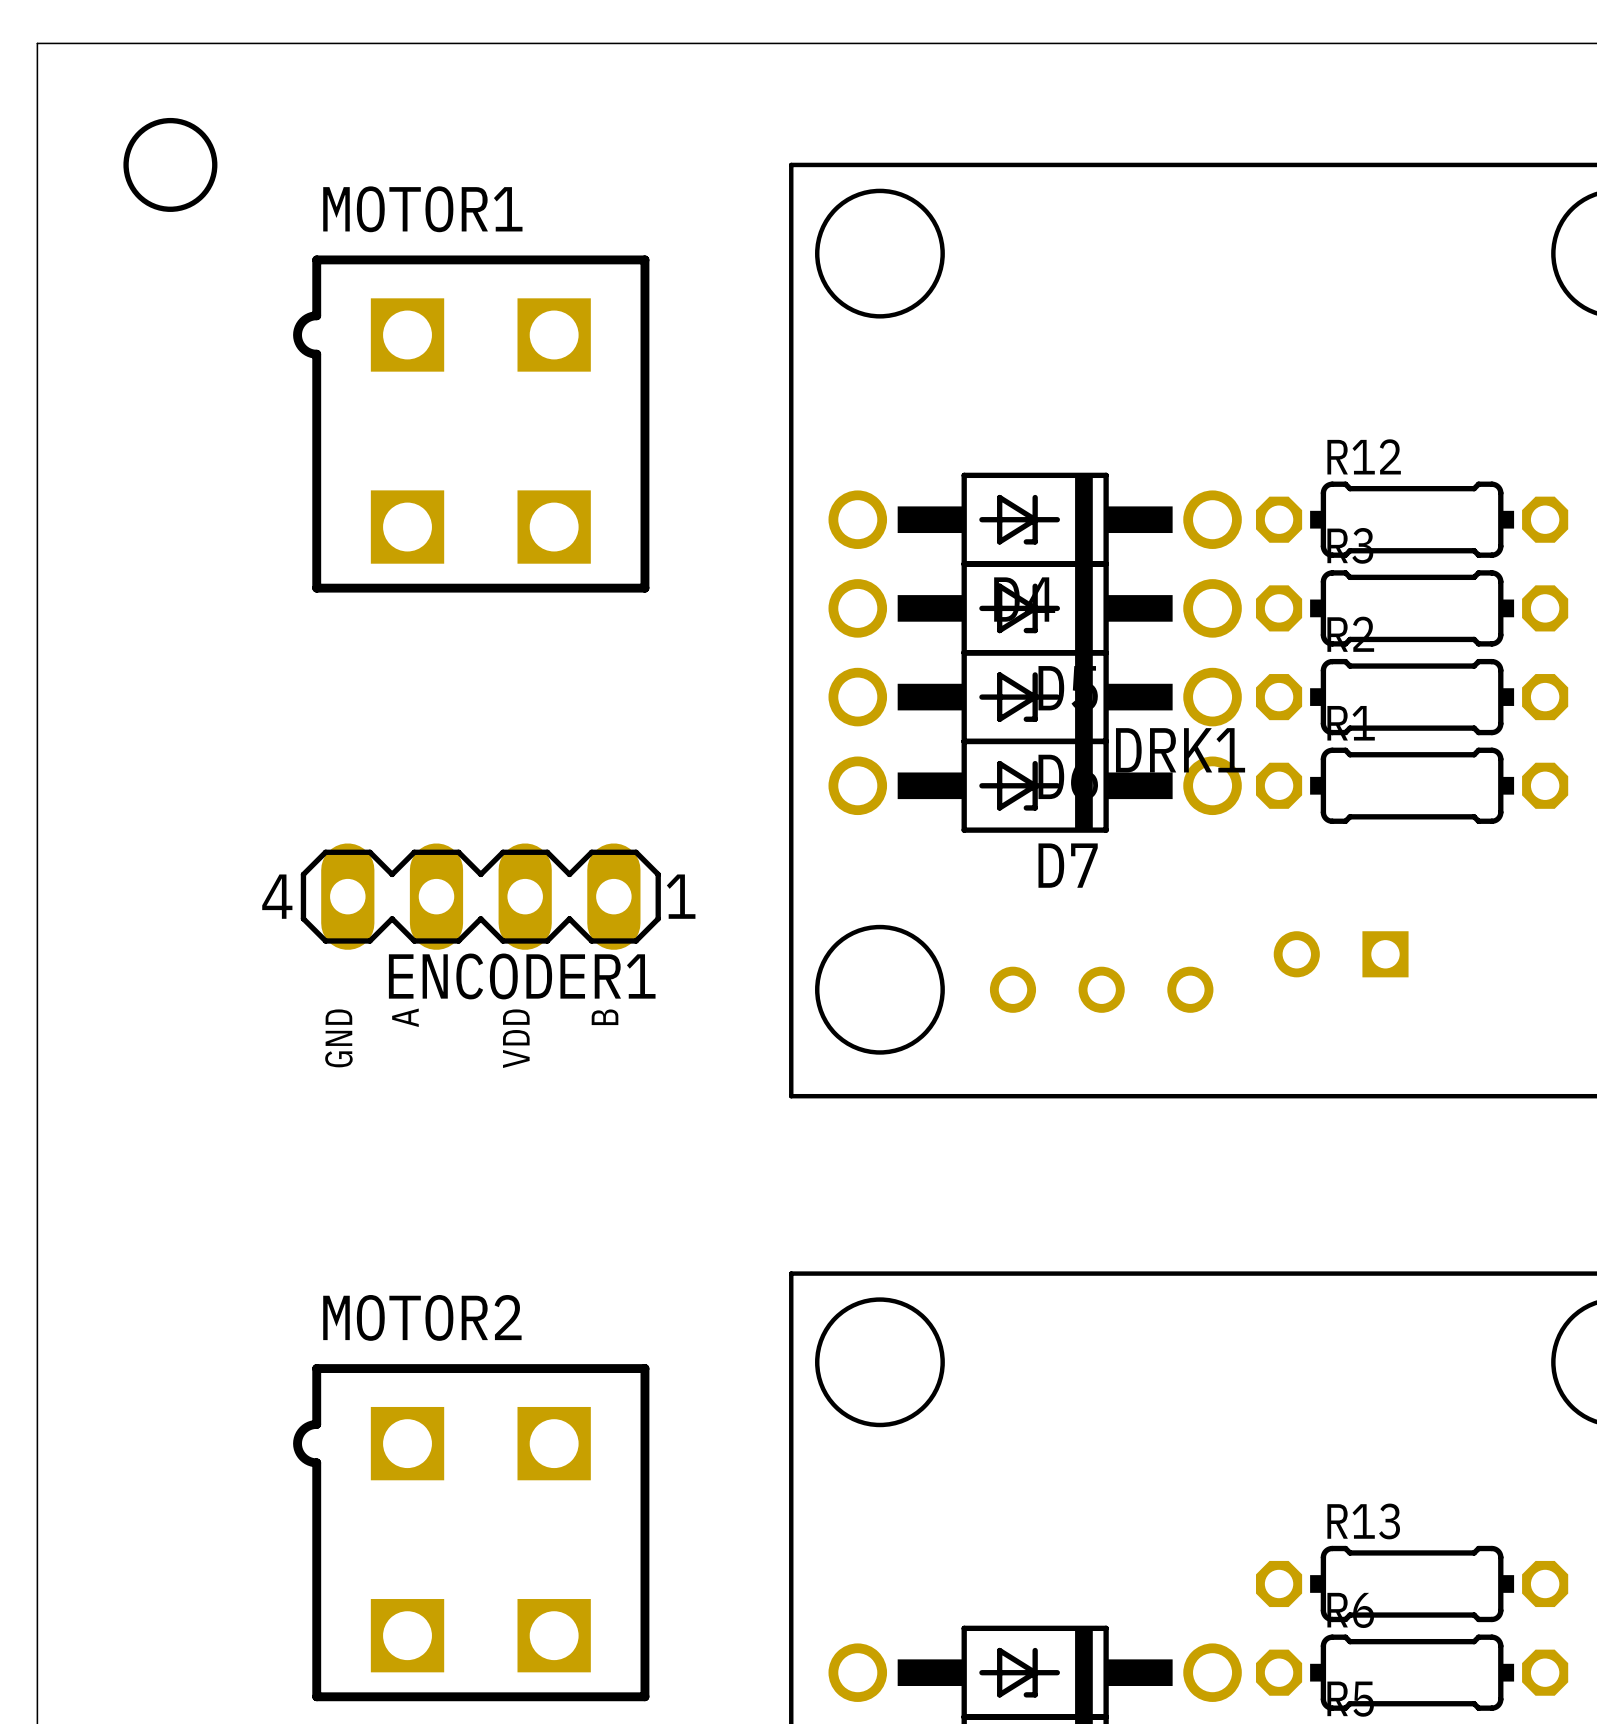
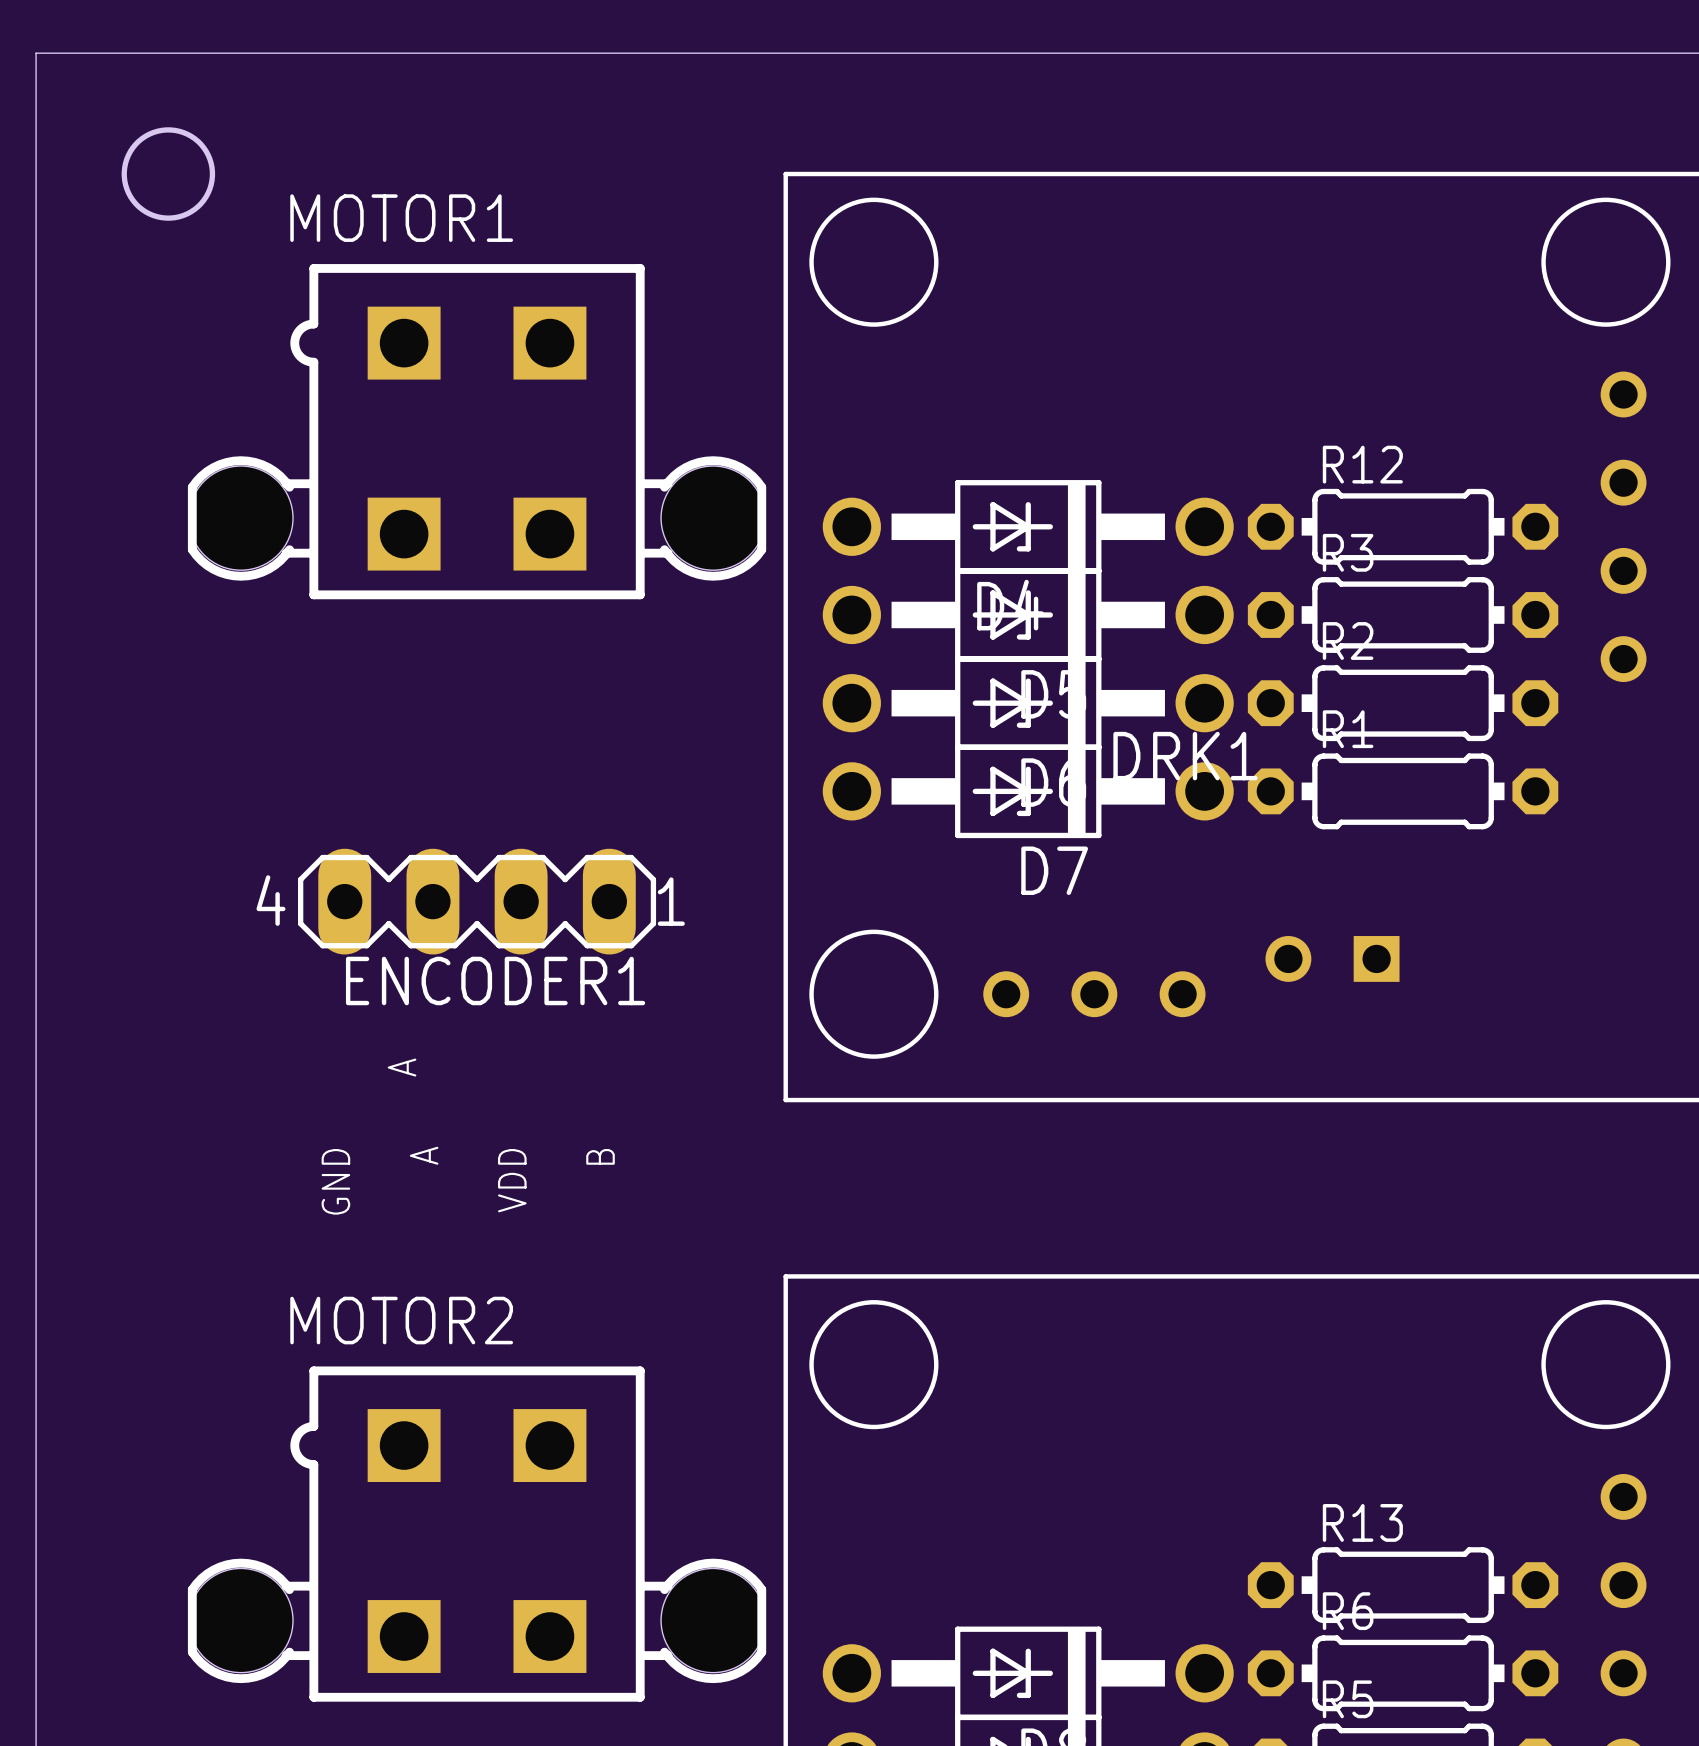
MOTOR1 footprint: [293, 255, 650, 593] -> [187, 264, 767, 600]
text position: A (405, 1017) -> A (402, 1067)
text position: B (605, 1017) -> B (600, 1156)
text position: GND (338, 1038) -> GND (335, 1181)
text position: VDD (516, 1038) -> VDD (512, 1180)
text: none -> A (424, 1155)
MOTOR2 footprint: [293, 1364, 650, 1702] -> [187, 1366, 767, 1702]

